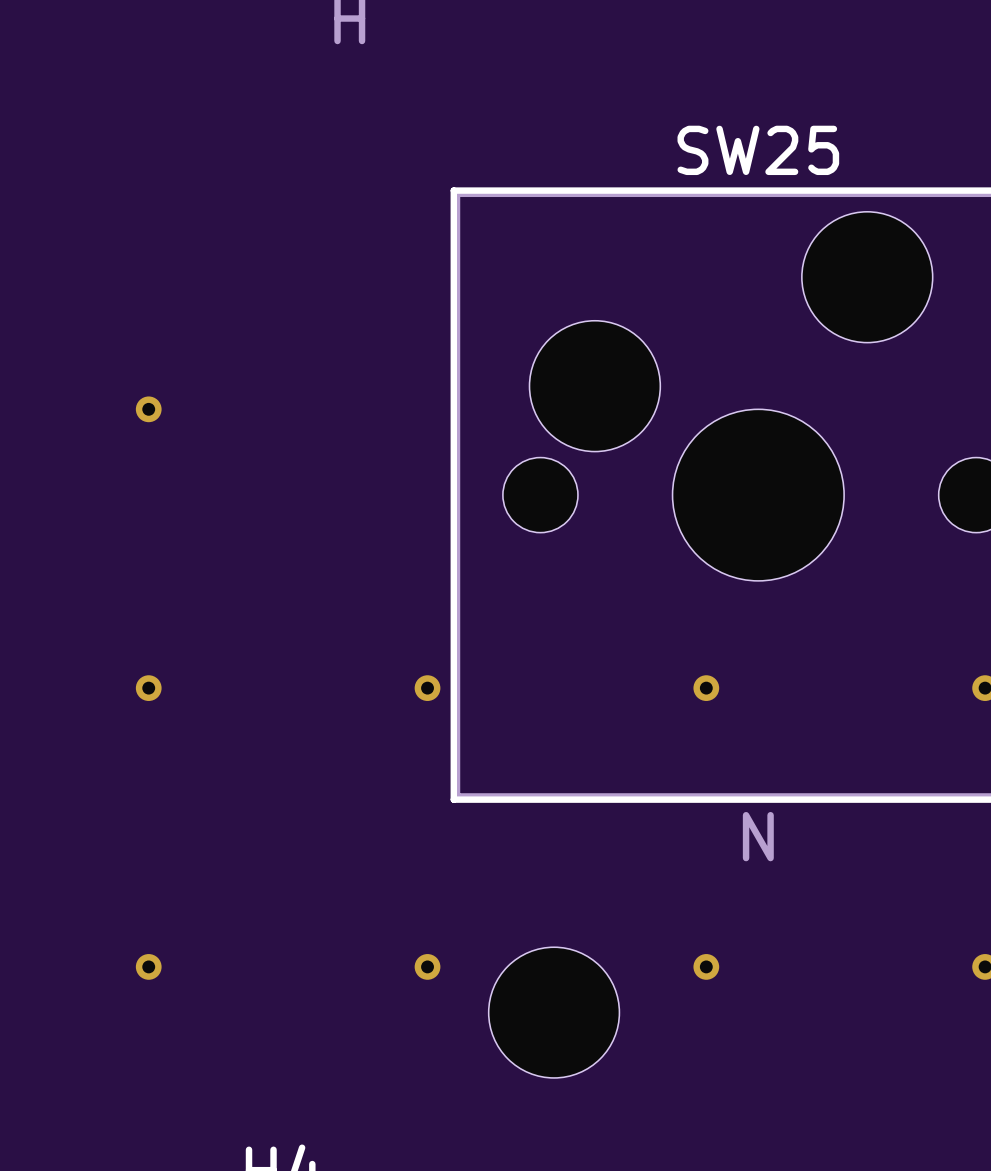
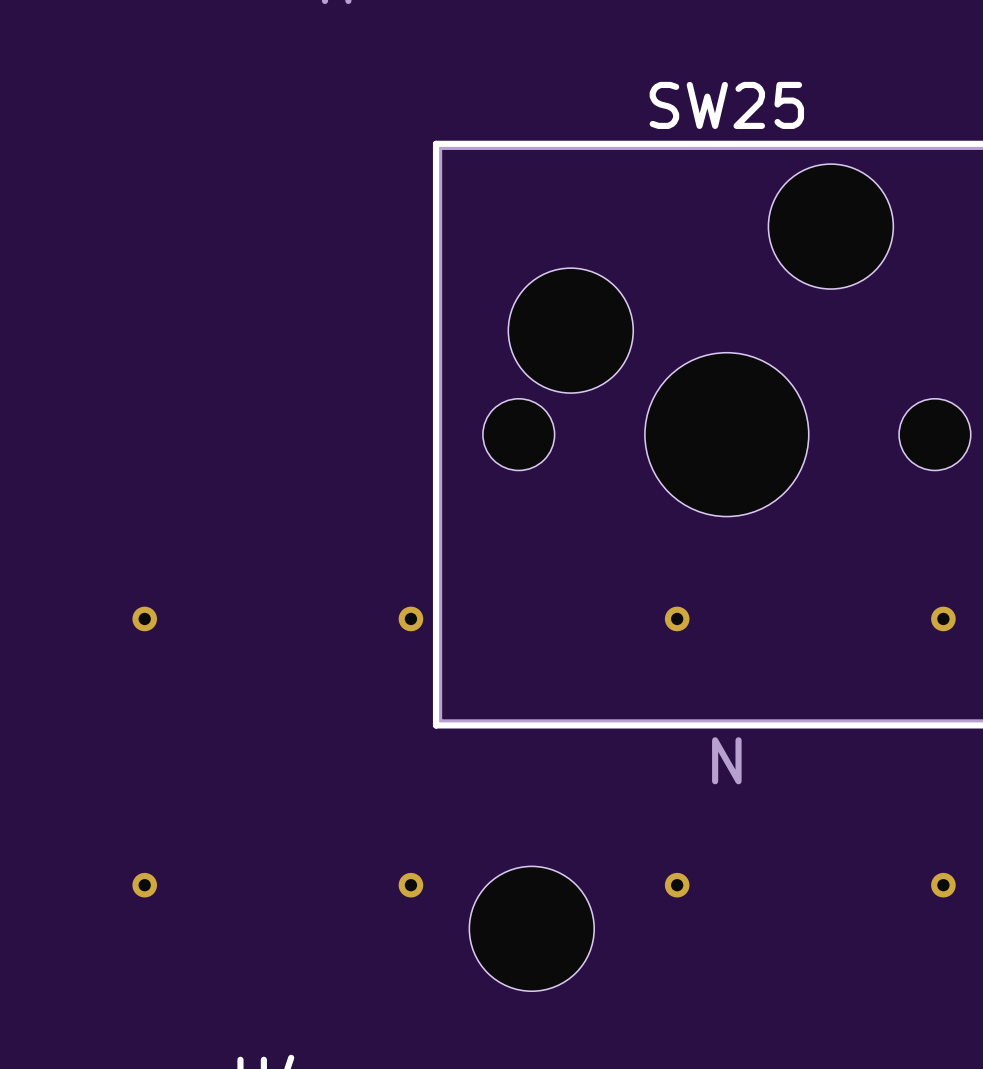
via: (148, 409) -> none

